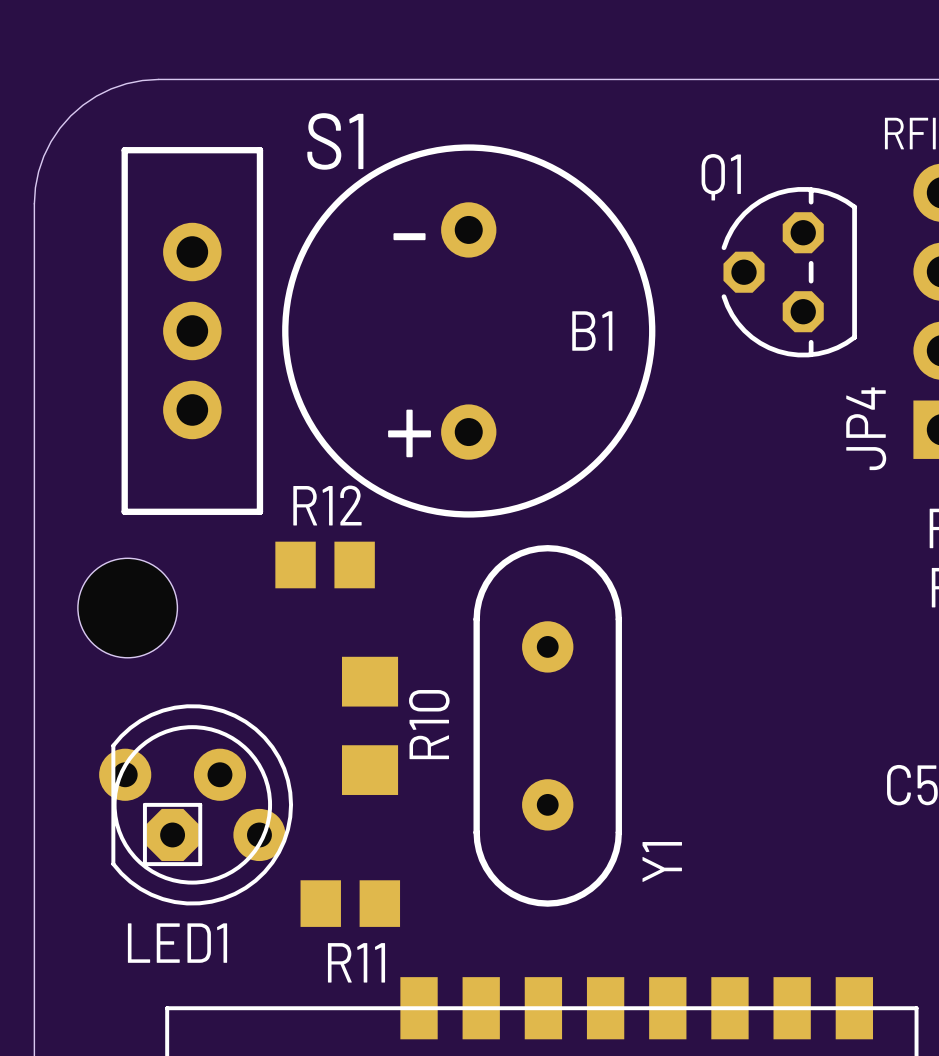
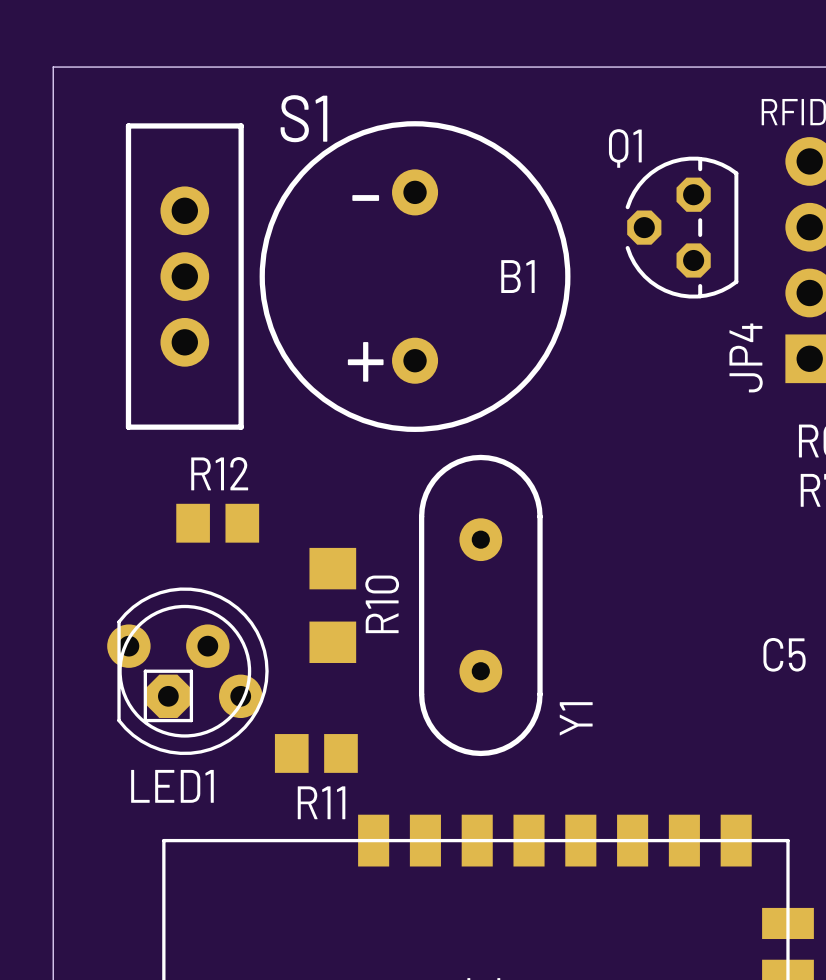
board edge: (158, 79) (142, 80) (111, 88) (96, 96) (70, 115) (51, 141) (43, 156) (35, 187) (34, 203) -> (156, 67) (53, 67) (53, 170)
R12 position: (325, 564) -> (217, 523)
hole: (127, 608) -> none

